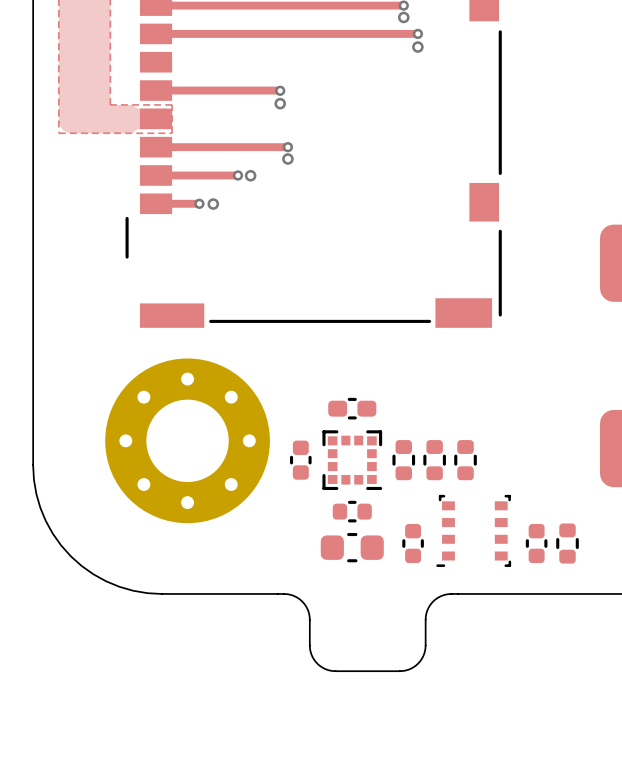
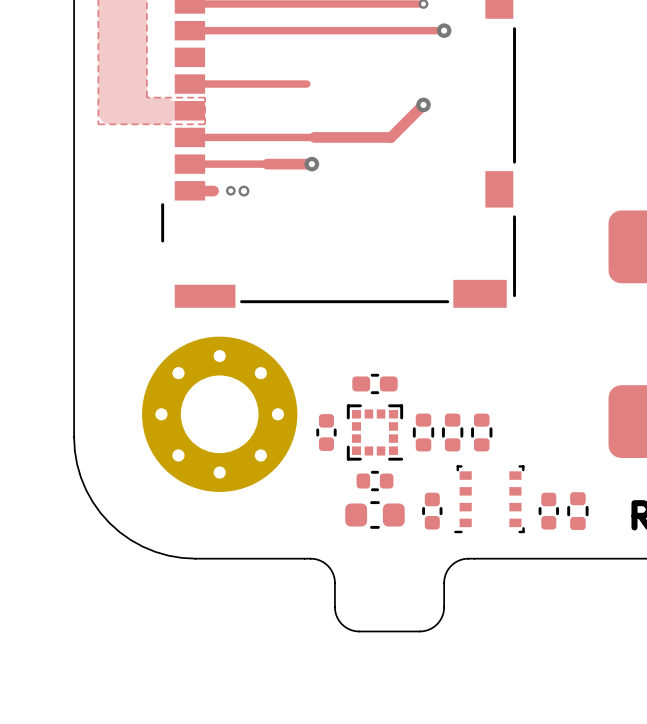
via: (403, 17) -> none
via: (417, 33) -> none
via: none -> (444, 30)
via: (417, 47) -> none
via: (280, 90) -> none
via: (280, 103) -> none
track: none -> (423, 104) (391, 137) (314, 137)
via: none -> (423, 104)
via: (287, 147) -> none
via: (287, 159) -> none
track: none -> (267, 164) (311, 164)
via: (238, 175) -> none
via: (250, 175) -> none
via: none -> (311, 164)
track: (156, 203) (199, 203) -> (190, 191) (213, 191)

